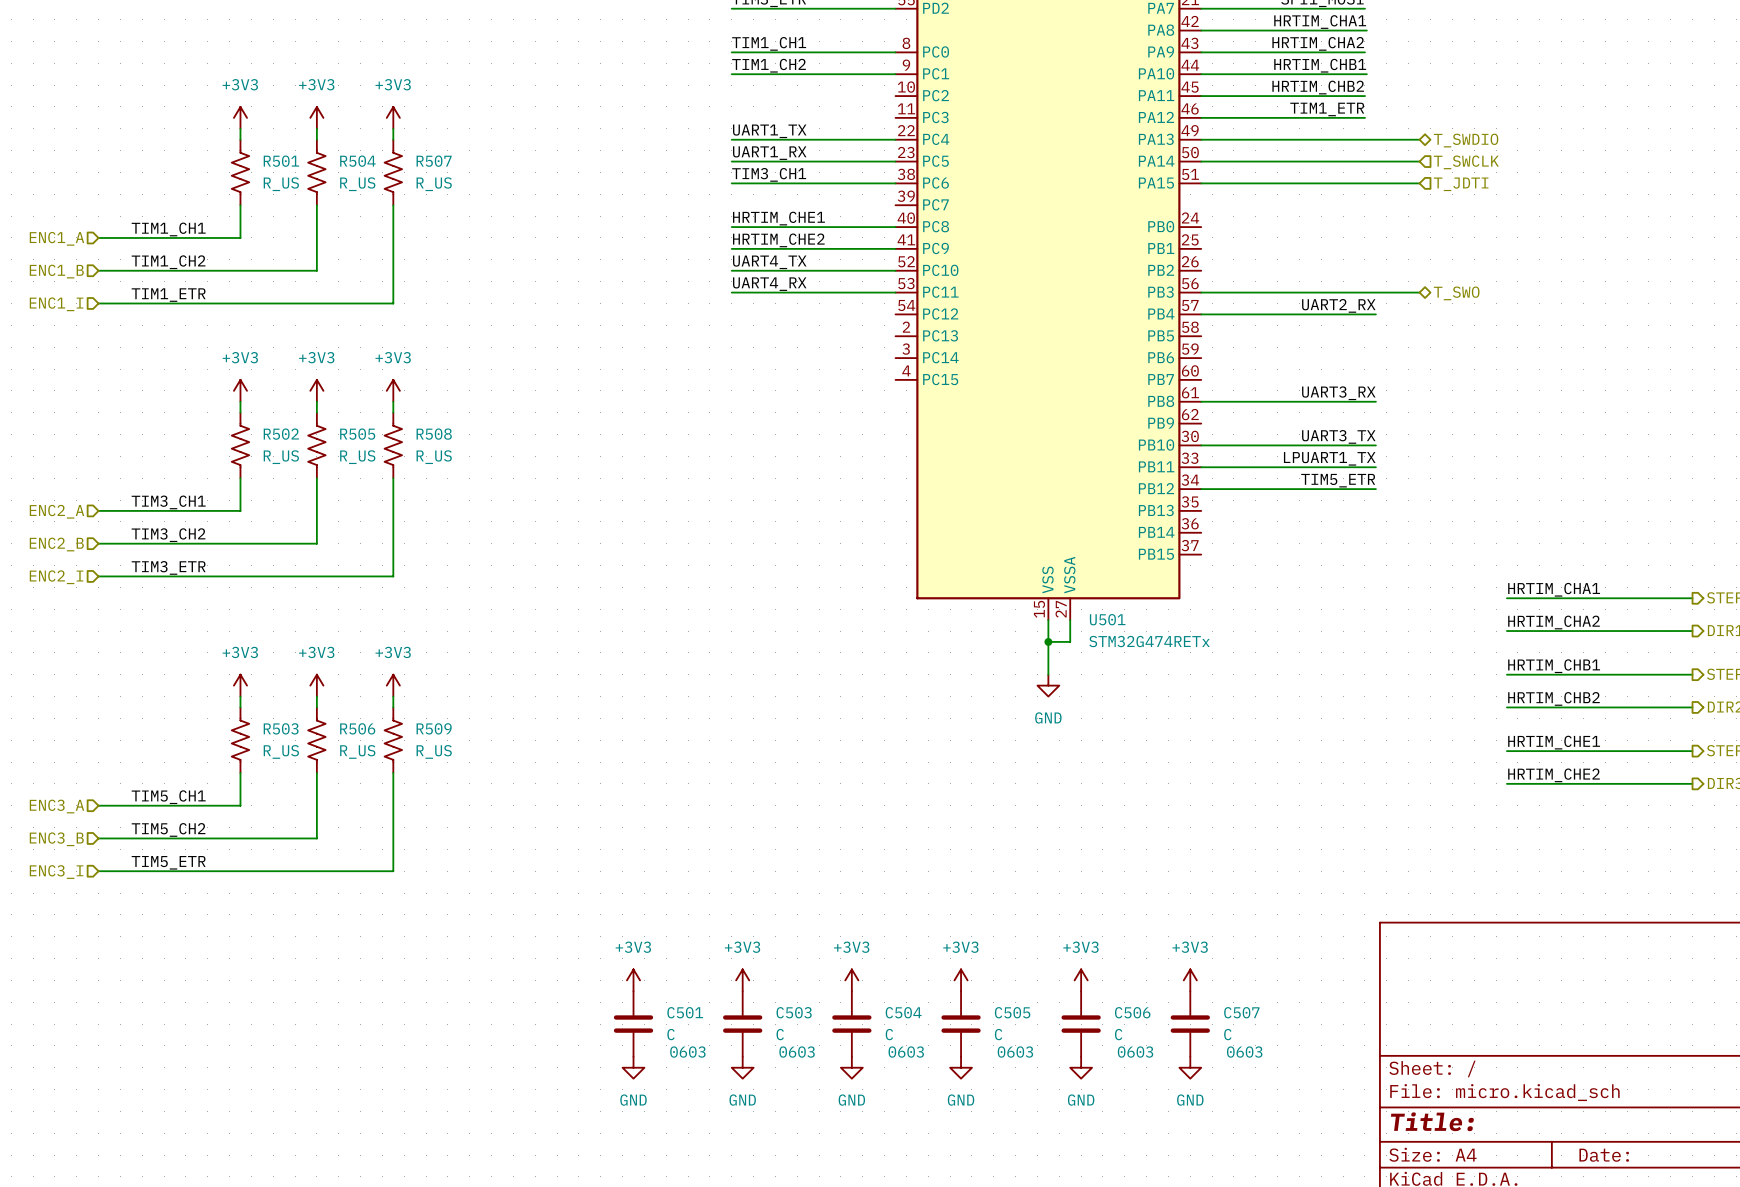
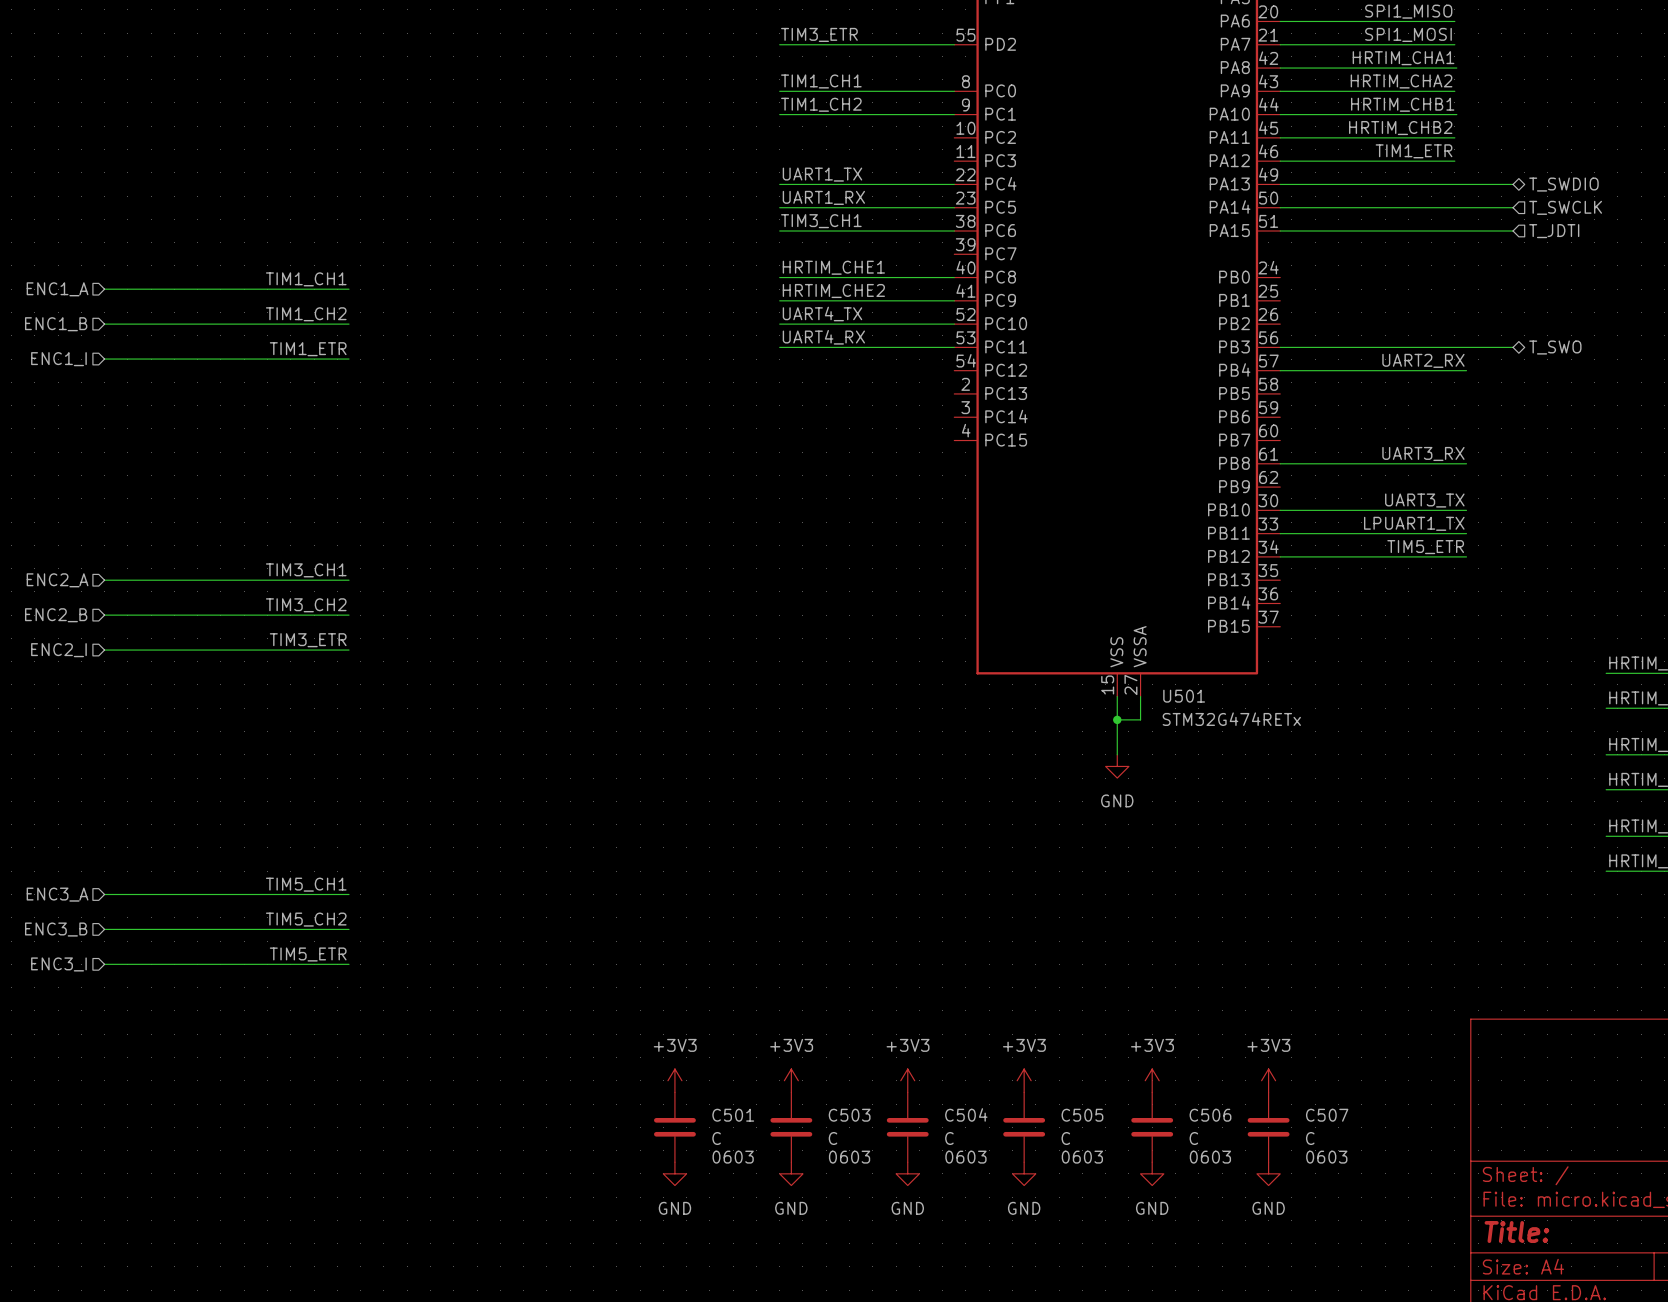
power symbol: +3V3 (240, 117) -> none
power symbol: +3V3 (316, 117) -> none
power symbol: +3V3 (393, 117) -> none
wire: (240, 128) (240, 139) -> none
wire: (316, 128) (316, 139) -> none
wire: (393, 128) (393, 139) -> none
R501: R_US (240, 172) -> none
R504: R_US (316, 172) -> none
R507: R_US (393, 172) -> none
wire: (240, 205) (240, 237) -> (349, 289) (255, 289)
wire: (316, 205) (316, 270) -> (349, 324) (337, 324)
wire: (393, 205) (393, 303) (327, 303) -> none
label position: TIM1_CH1 (168, 229) -> TIM1_CH1 (306, 279)
label position: TIM1_CH2 (168, 262) -> TIM1_CH2 (306, 314)
label position: TIM1_ETR (168, 295) -> TIM1_ETR (308, 349)
power symbol: +3V3 (240, 390) -> none
power symbol: +3V3 (316, 390) -> none
power symbol: +3V3 (393, 390) -> none
wire: (240, 401) (240, 412) -> none
wire: (316, 401) (316, 412) -> none
wire: (393, 401) (393, 412) -> none
R502: R_US (240, 445) -> none
R505: R_US (316, 445) -> none
R508: R_US (393, 445) -> none
wire: (240, 478) (240, 510) -> (349, 580) (255, 580)
wire: (316, 478) (316, 543) -> (349, 615) (337, 615)
wire: (393, 478) (393, 576) (327, 576) -> none
label position: TIM3_CH1 (168, 502) -> TIM3_CH1 (306, 570)
label position: TIM3_CH2 (168, 535) -> TIM3_CH2 (306, 605)
label position: TIM3_ETR (168, 567) -> TIM3_ETR (308, 640)
power symbol: +3V3 (240, 685) -> none
power symbol: +3V3 (316, 685) -> none
power symbol: +3V3 (393, 685) -> none
wire: (240, 696) (240, 707) -> none
wire: (316, 696) (316, 707) -> none
wire: (393, 696) (393, 707) -> none
R503: R_US (240, 740) -> none
R506: R_US (316, 740) -> none
R509: R_US (393, 740) -> none
wire: (240, 772) (240, 805) -> (349, 894) (255, 894)
wire: (316, 772) (316, 838) -> (349, 929) (337, 929)
wire: (393, 772) (393, 871) (327, 871) -> none
label position: TIM5_CH1 (168, 797) -> TIM5_CH1 (306, 884)
label position: TIM5_CH2 (168, 829) -> TIM5_CH2 (306, 919)
label position: TIM5_ETR (168, 862) -> TIM5_ETR (308, 954)

